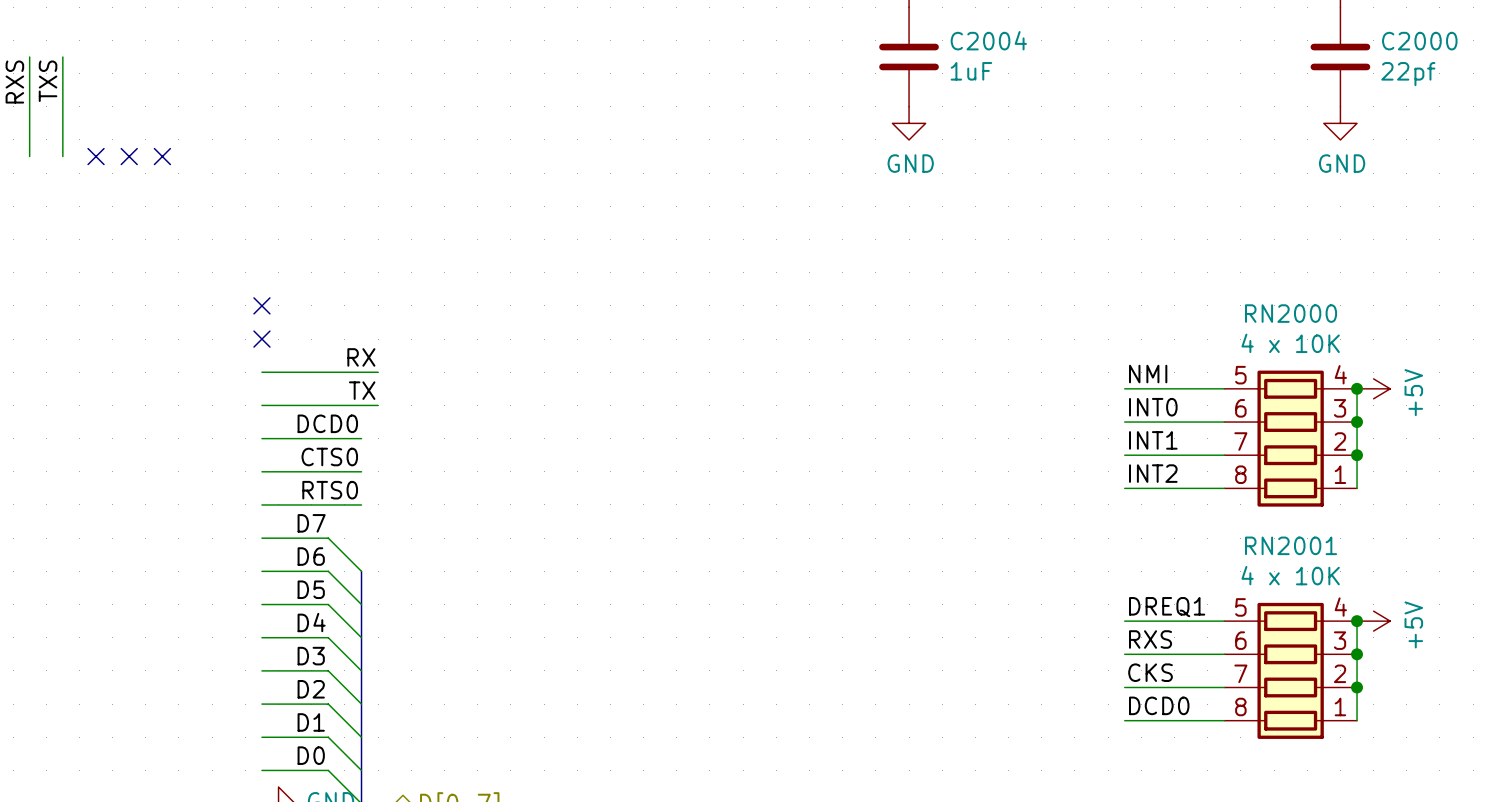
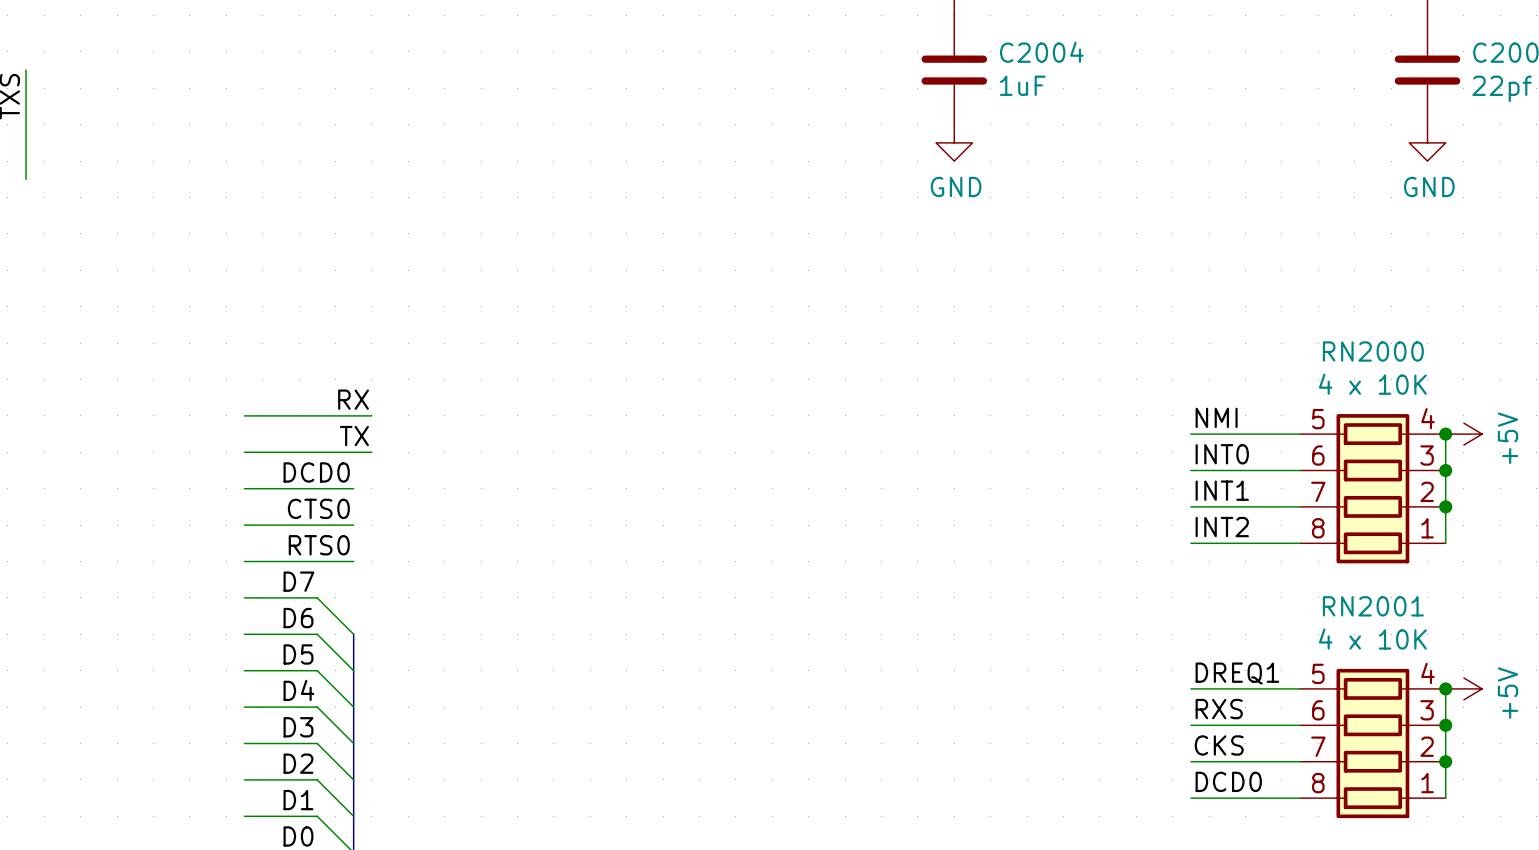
no-connect mark: (96, 156) -> none
no-connect mark: (129, 156) -> none
no-connect mark: (162, 156) -> none
no-connect mark: (261, 305) -> none
no-connect mark: (261, 339) -> none

